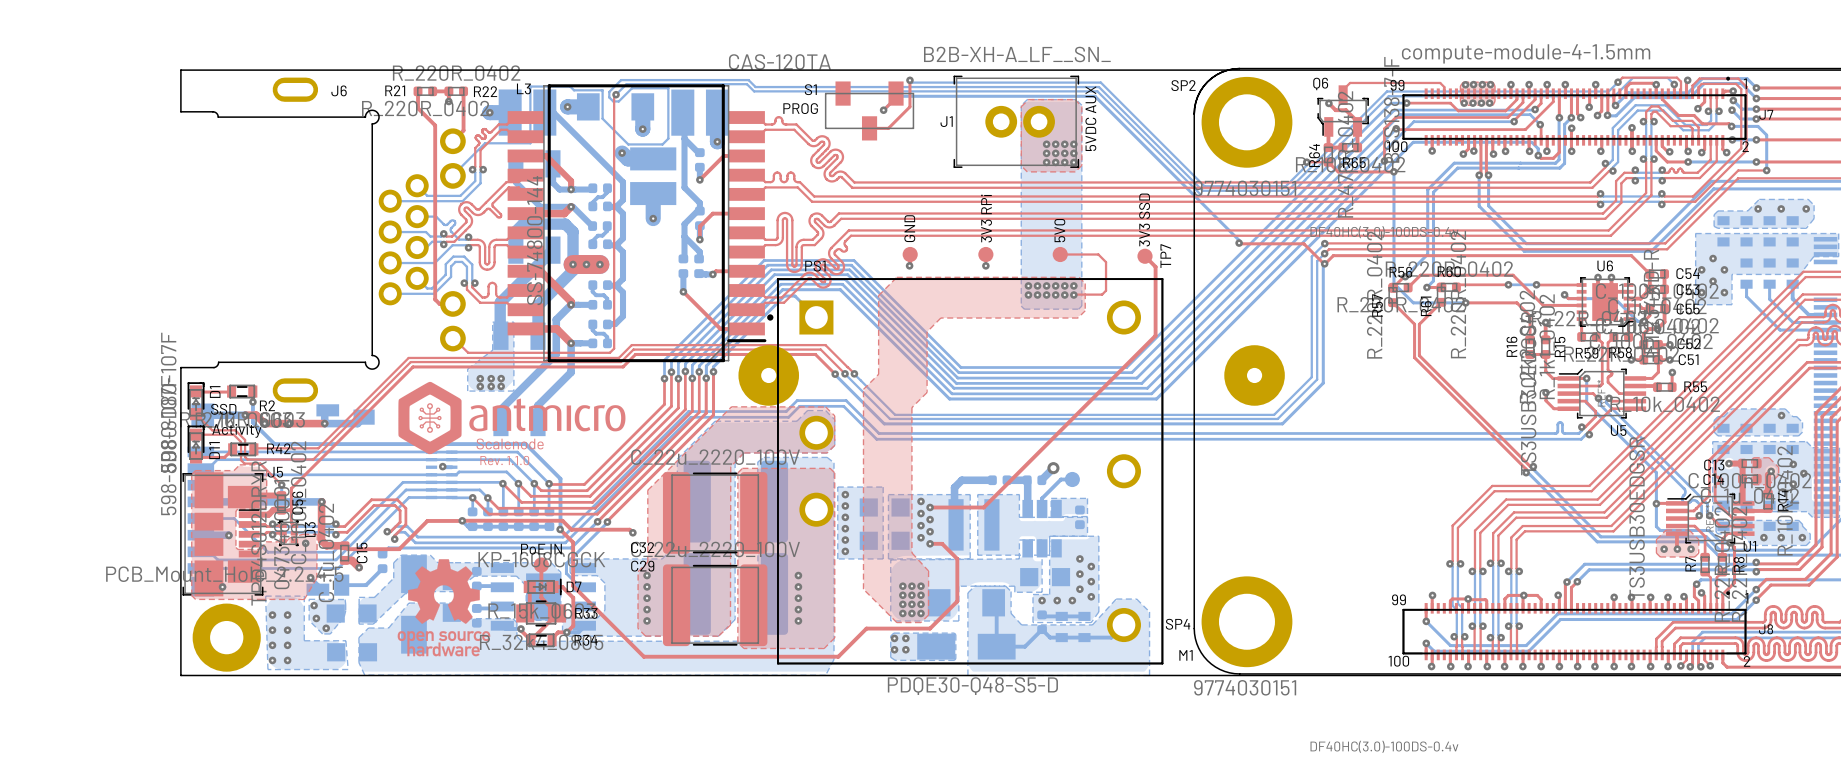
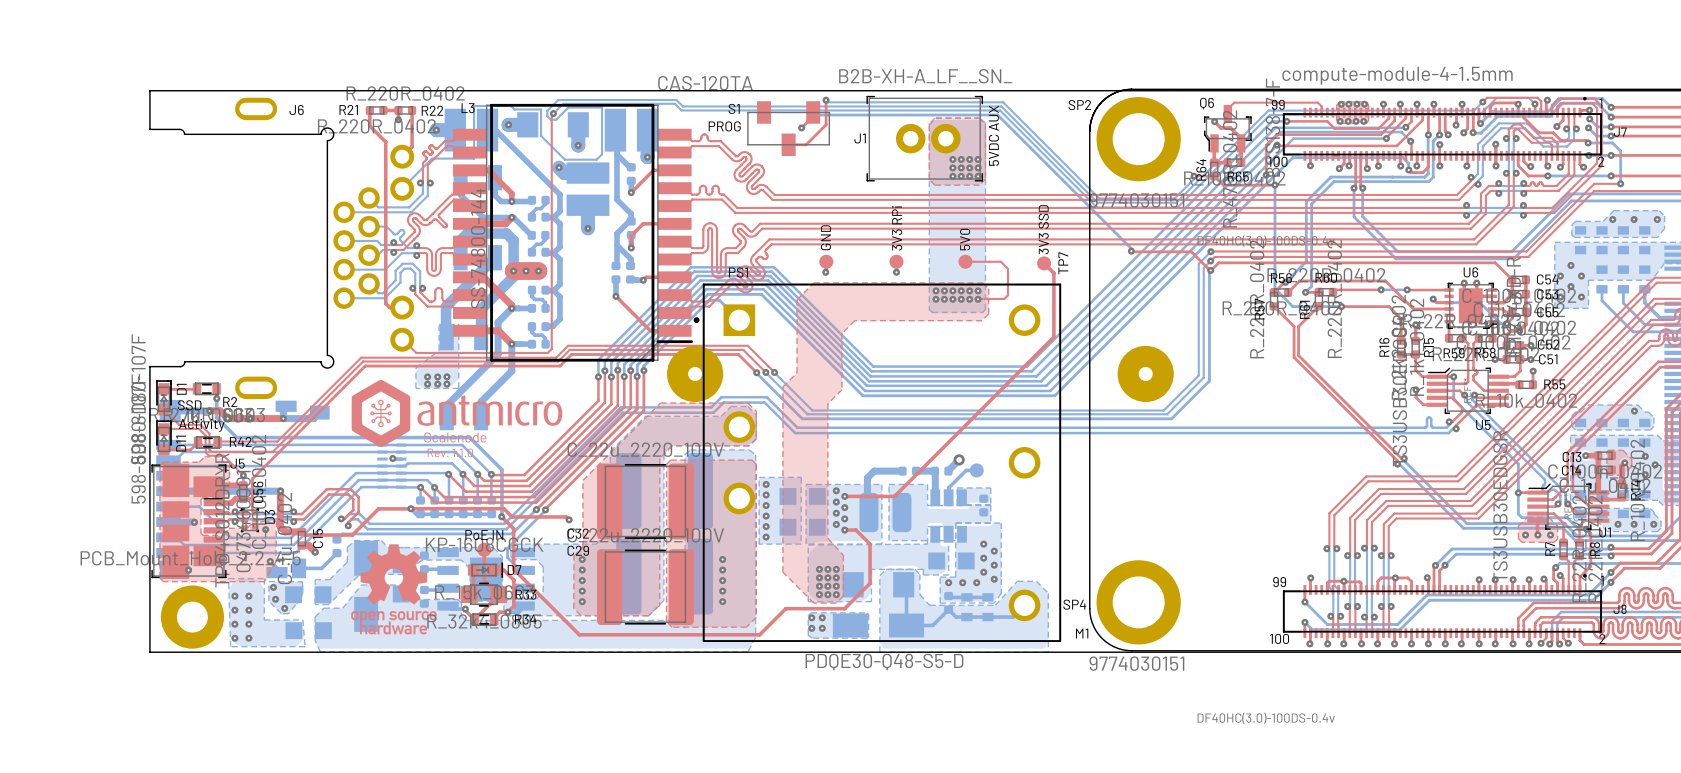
part footprint: [948, 499, 1000, 551] -> [859, 492, 912, 533]

